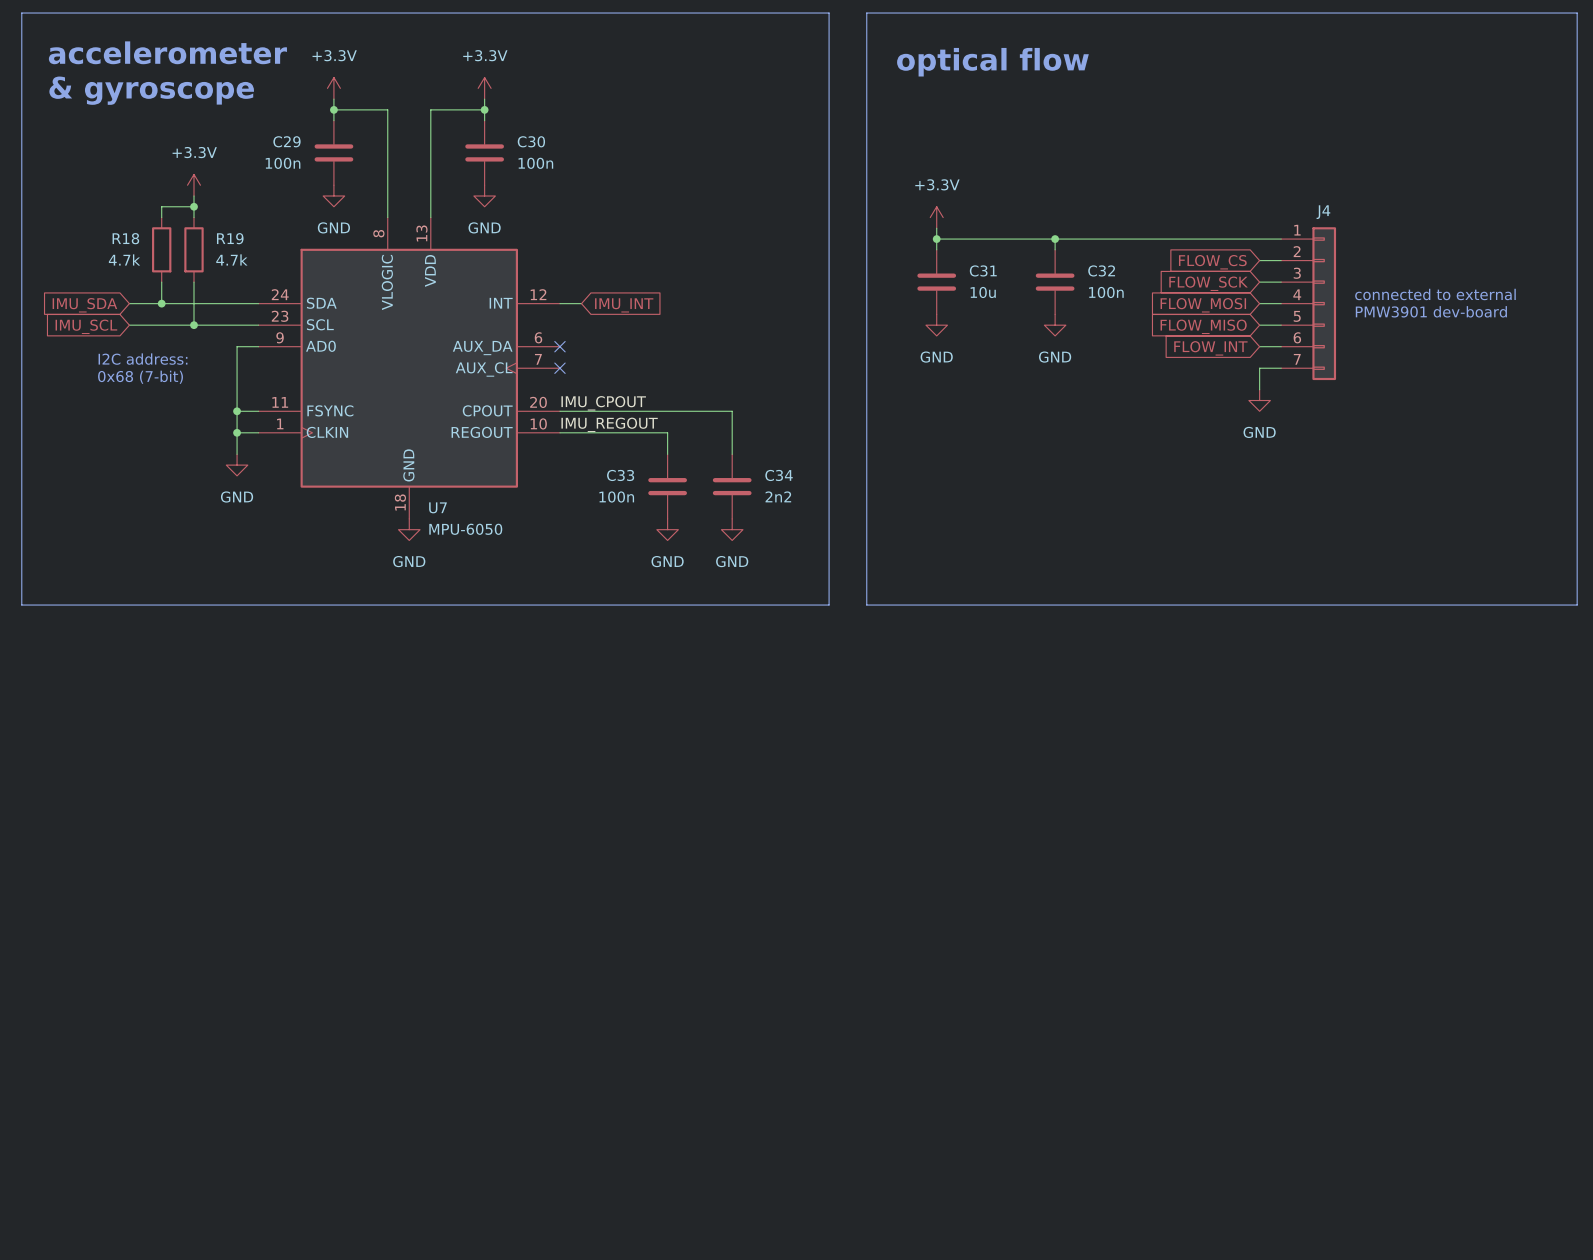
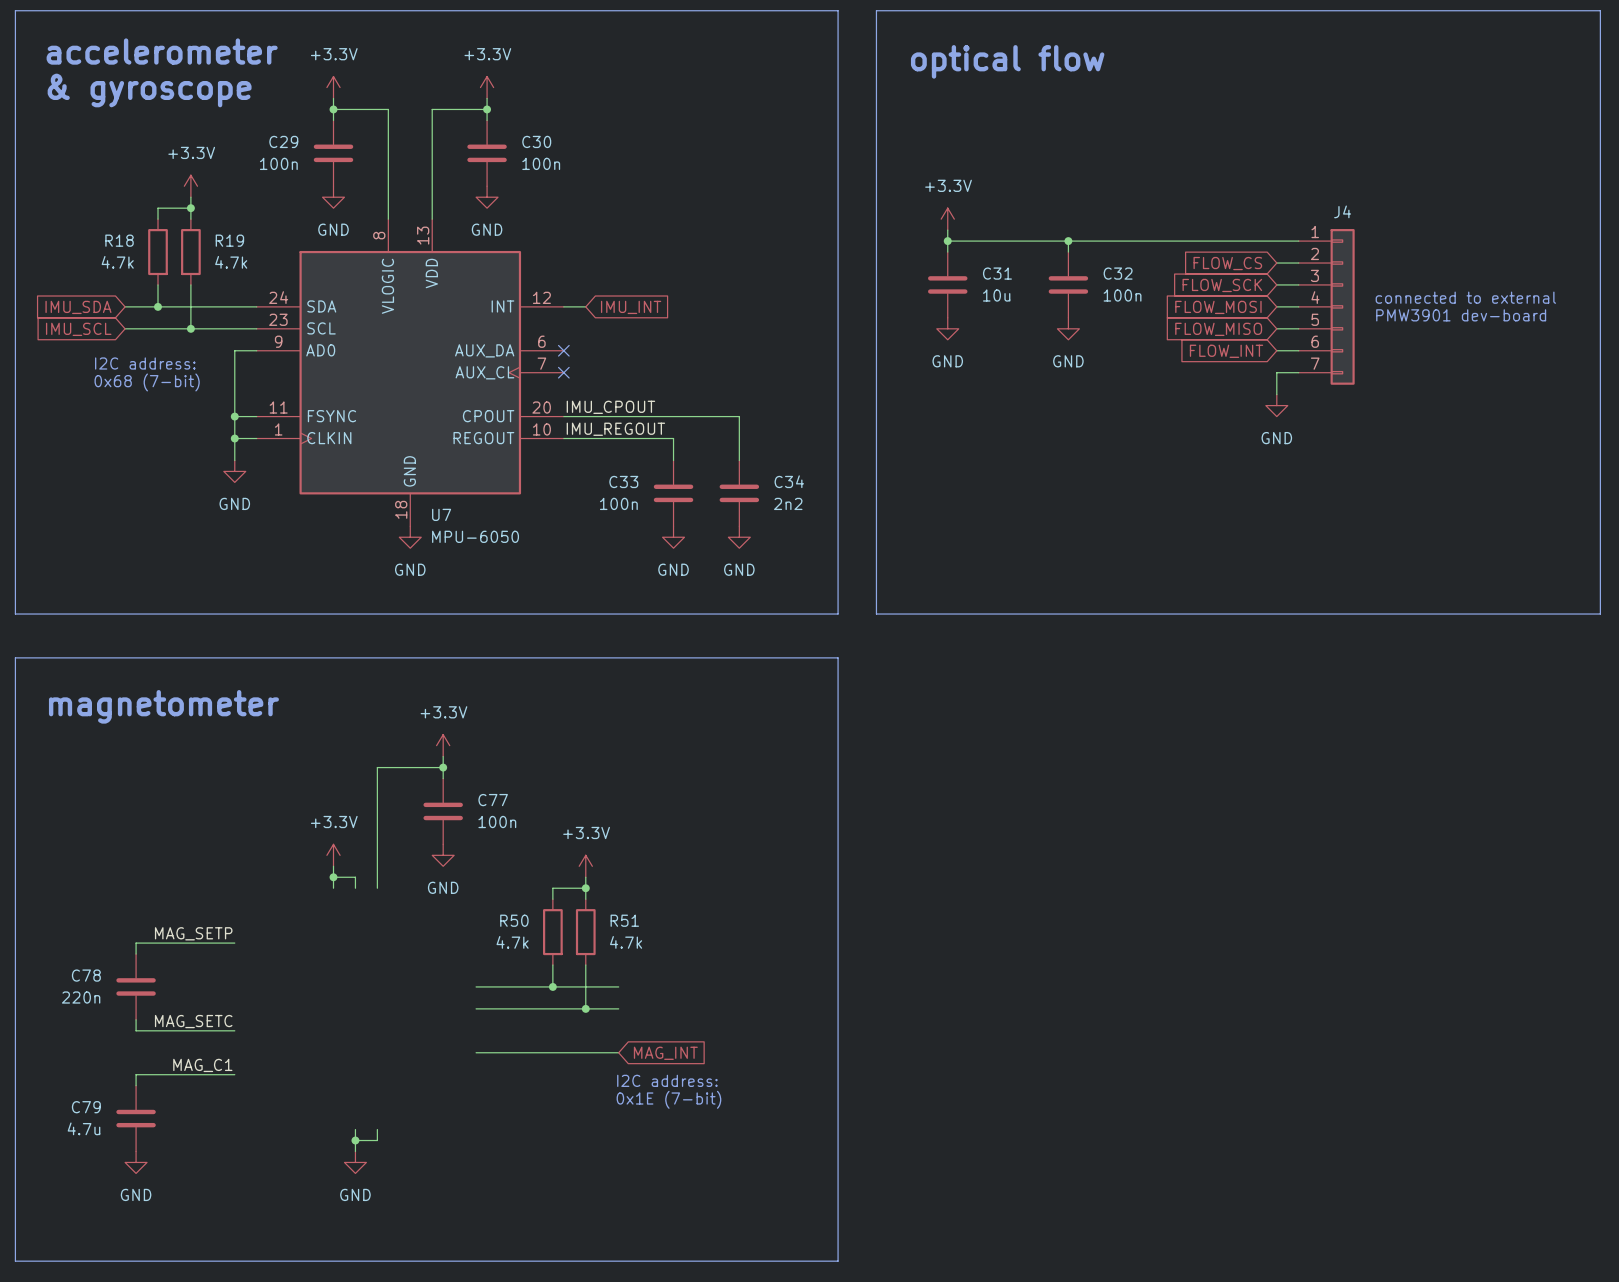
line: none -> (15, 657) (838, 657) (838, 1261) (15, 1261) (15, 657)
text: none -> magnetometer (163, 706)
power symbol: none -> +3.3V (443, 745)
wire: none -> (443, 756) (443, 778)
wire: none -> (443, 767) (377, 767) (377, 888)
junction: none -> (443, 767)
C77: none -> 100n (443, 811)
power symbol: none -> +3.3V (333, 855)
power symbol: none -> GND (443, 855)
wire: none -> (333, 866) (333, 888)
power symbol: none -> +3.3V (585, 866)
wire: none -> (333, 877) (355, 877) (355, 888)
junction: none -> (333, 877)
wire: none -> (585, 877) (585, 899)
wire: none -> (585, 888) (552, 888) (552, 899)
junction: none -> (585, 888)
R50: none -> 4.7k (552, 932)
R51: none -> 4.7k (585, 932)
label: none -> MAG_SETP (193, 933)
wire: none -> (234, 943) (136, 943) (136, 954)
wire: none -> (552, 965) (552, 986)
wire: none -> (585, 965) (585, 1008)
C78: none -> 220n (136, 986)
wire: none -> (476, 986) (618, 986)
junction: none -> (552, 986)
wire: none -> (476, 1008) (618, 1008)
junction: none -> (585, 1008)
wire: none -> (136, 1019) (136, 1030) (234, 1030)
label: none -> MAG_SETC (193, 1021)
wire: none -> (476, 1052) (618, 1052)
global label: none -> MAG_INT (665, 1053)
label: none -> MAG_C1 (202, 1065)
wire: none -> (234, 1074) (136, 1074) (136, 1085)
text: none -> I2C address: (667, 1080)
text: none -> 0x1E (7-bit) (668, 1099)
C79: none -> 4.7u (136, 1118)
wire: none -> (355, 1129) (355, 1151)
wire: none -> (377, 1129) (377, 1140) (355, 1140)
junction: none -> (355, 1140)
power symbol: none -> GND (136, 1162)
power symbol: none -> GND (355, 1162)

